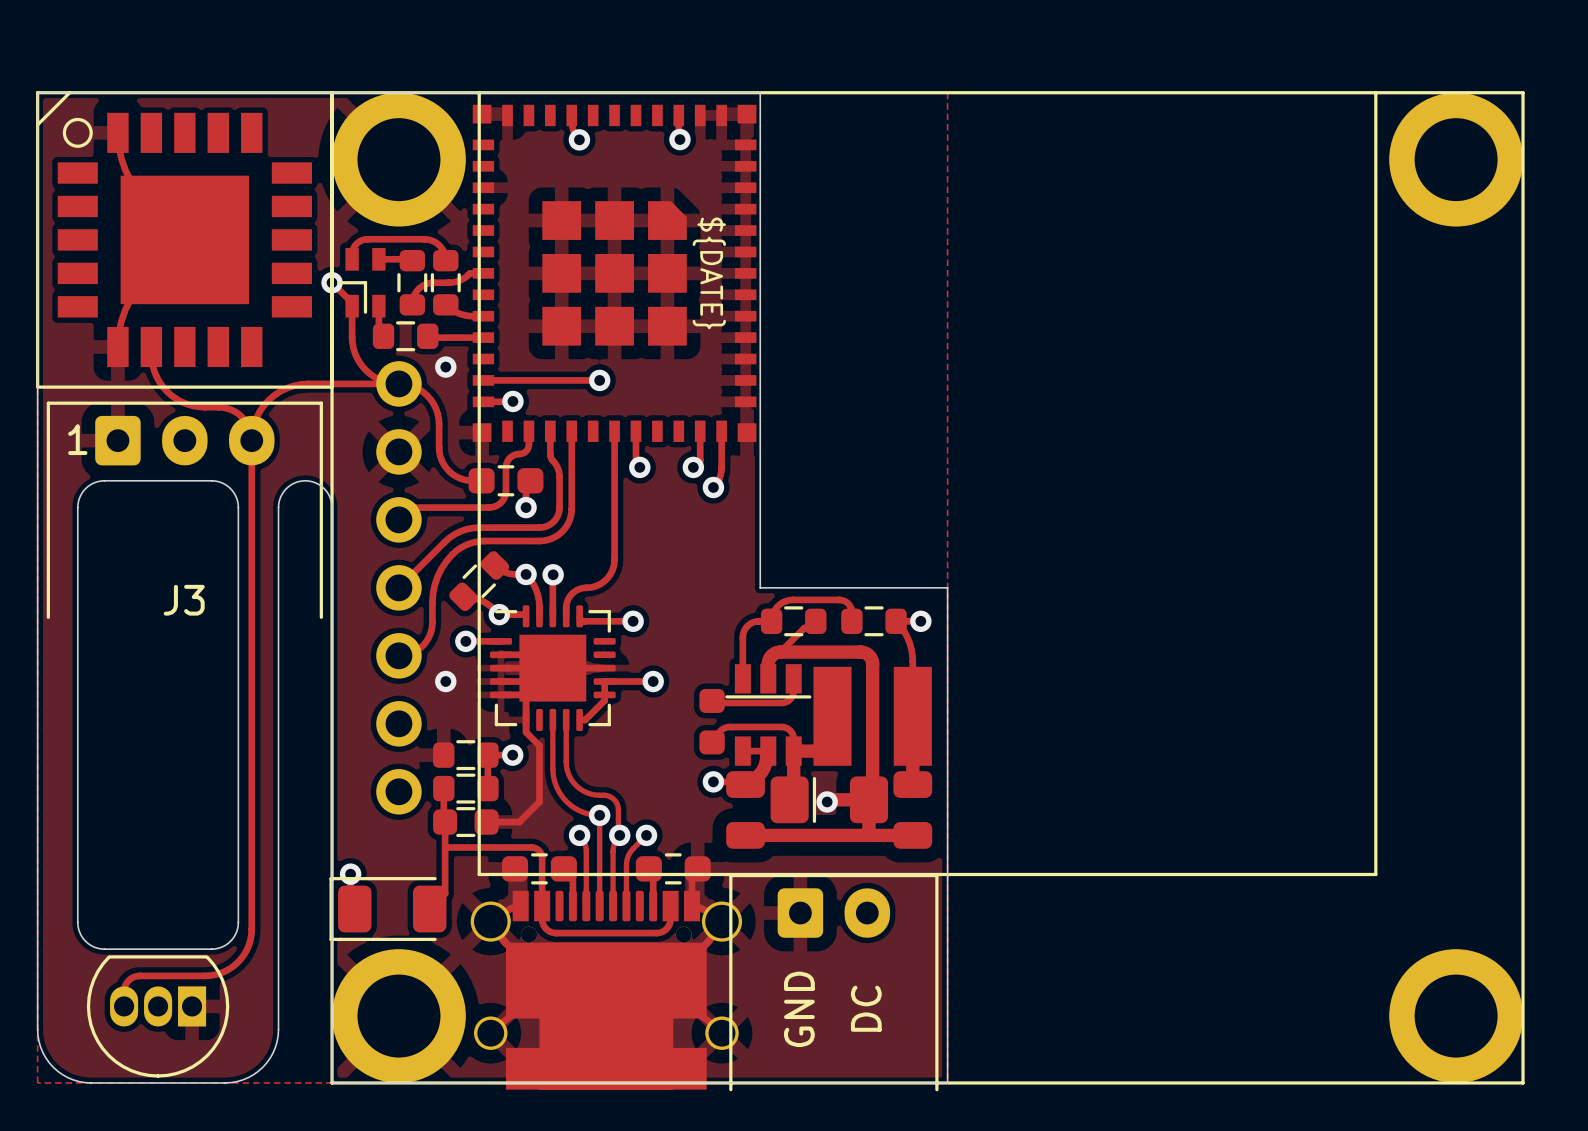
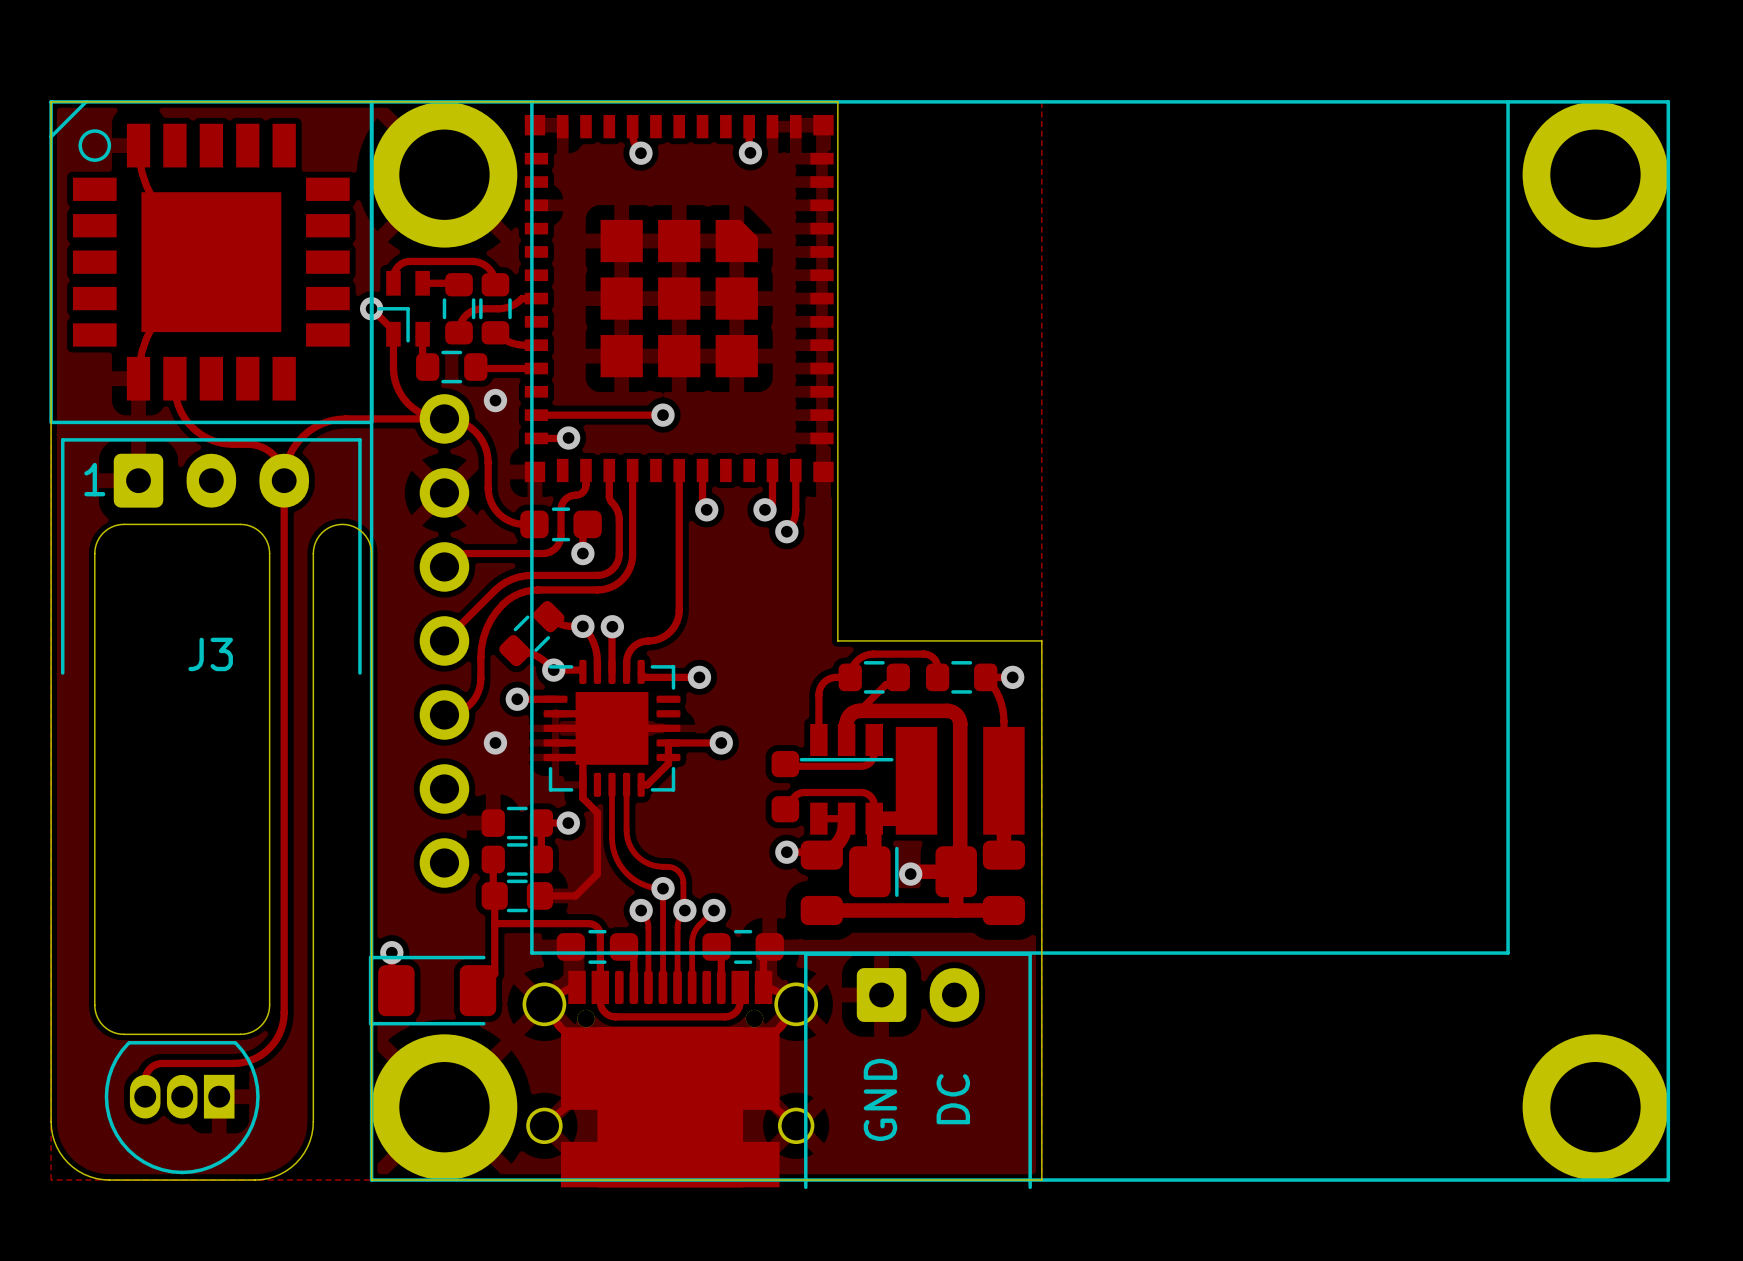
part text: ${DATE} (709, 273) -> none

